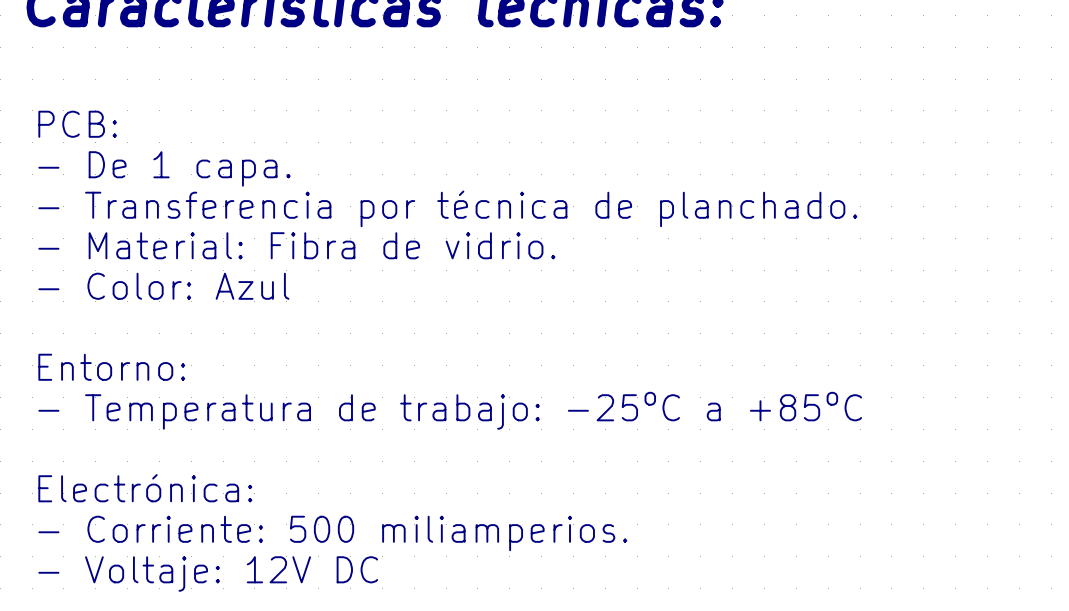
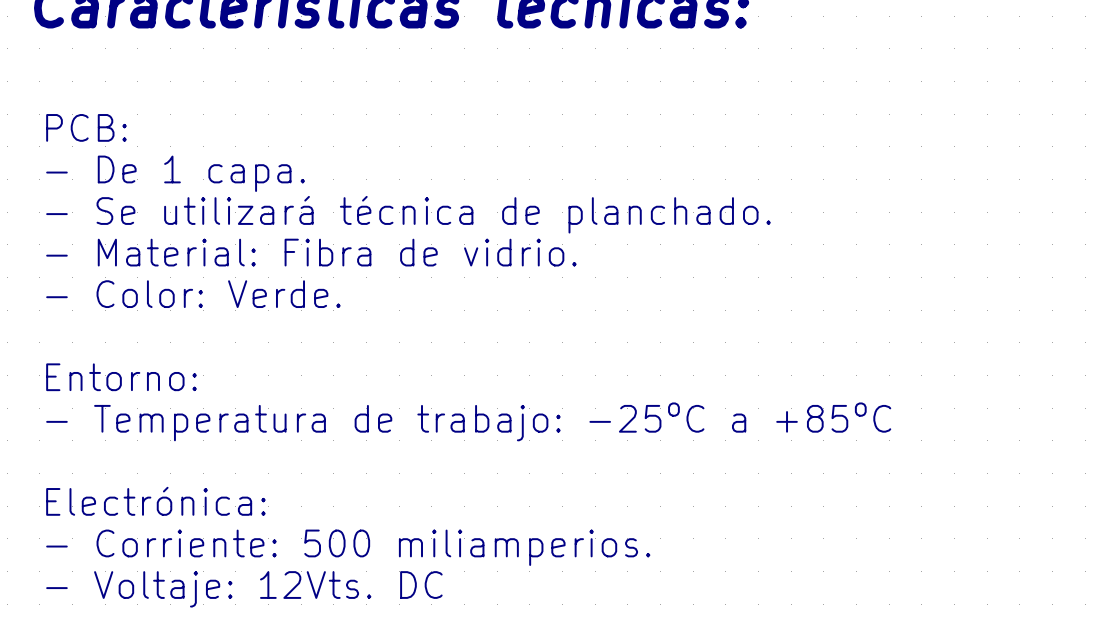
text: - Transferencia por técnica de planchado. (447, 208) -> - Se utilizará técnica de planchado. (408, 214)
text: - Color: Azul (163, 286) -> - Color: Verde. (193, 294)
text: - Voltaje: 12V DC (208, 573) -> - Voltaje: 12Vts. DC (244, 589)

